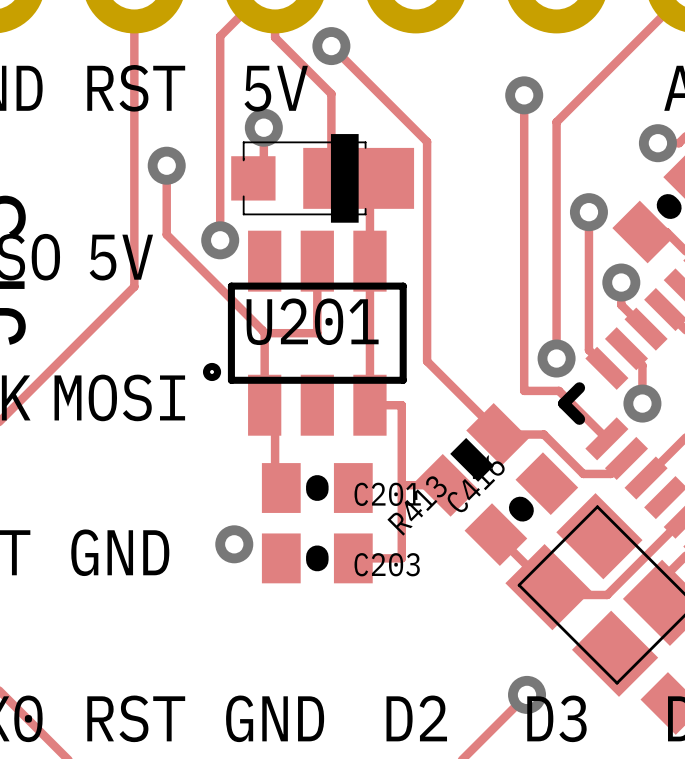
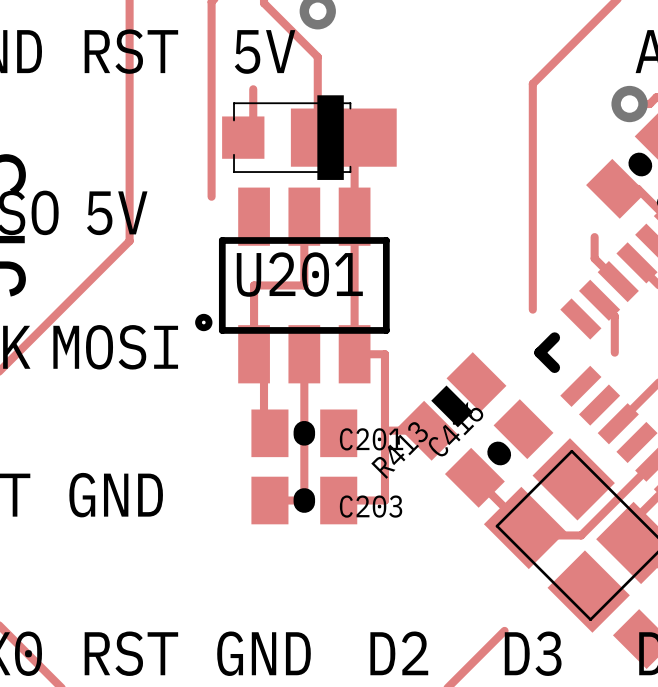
track: (331, 46) (427, 141) (427, 361) (496, 430) (497, 434) (543, 434) (583, 473) (610, 473) (626, 458) -> none
track: (524, 95) (524, 390) (558, 390) (606, 438) -> none
via: (524, 95) -> none
via: (263, 127) -> none
track: (166, 165) (166, 234) (264, 333) -> none
via: (166, 165) -> none
track: (588, 212) (588, 350) (606, 368) -> none
via: (588, 212) -> none
via: (220, 240) -> none
via: (621, 282) -> none
via: (556, 358) -> none
via: (642, 403) -> none
track: none -> (304, 354) (304, 500) (269, 500)
via: (234, 544) -> none
via: (527, 694) -> none

